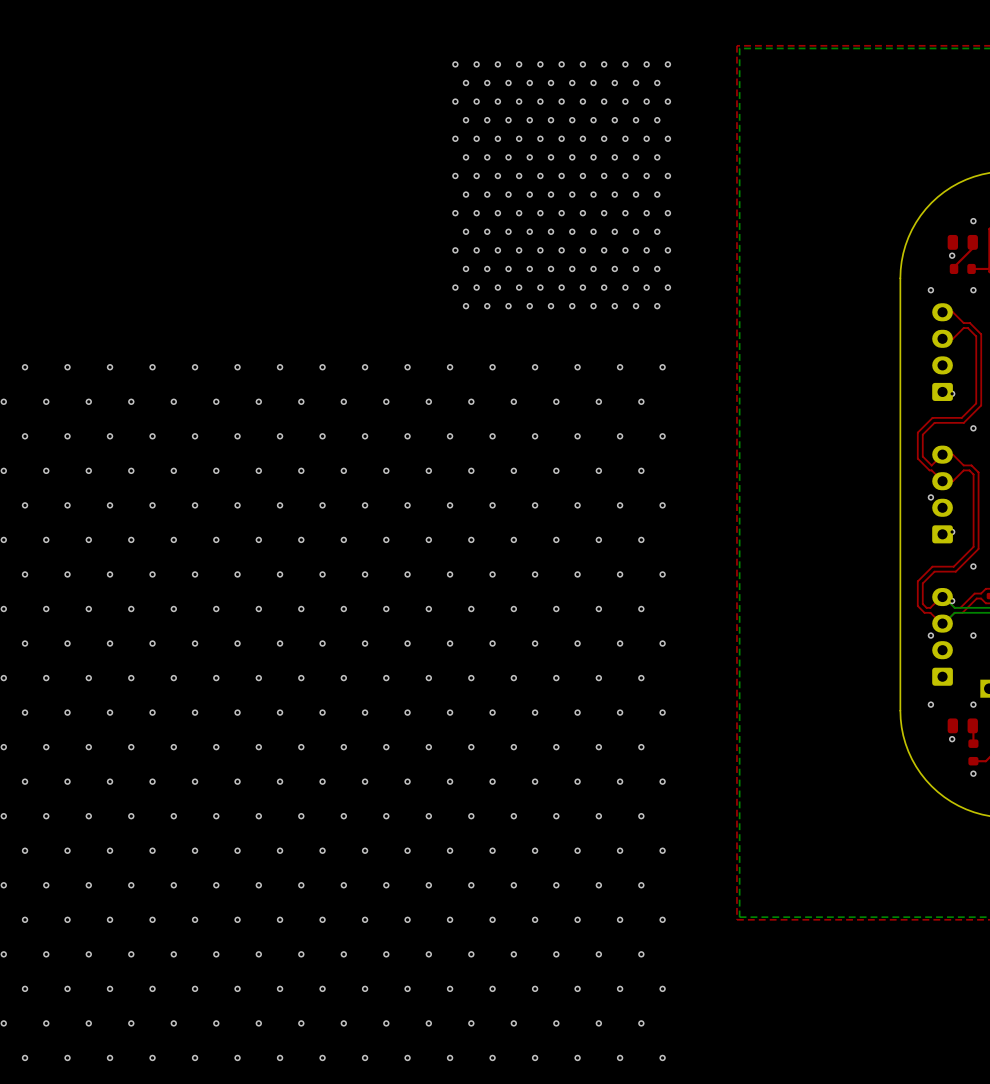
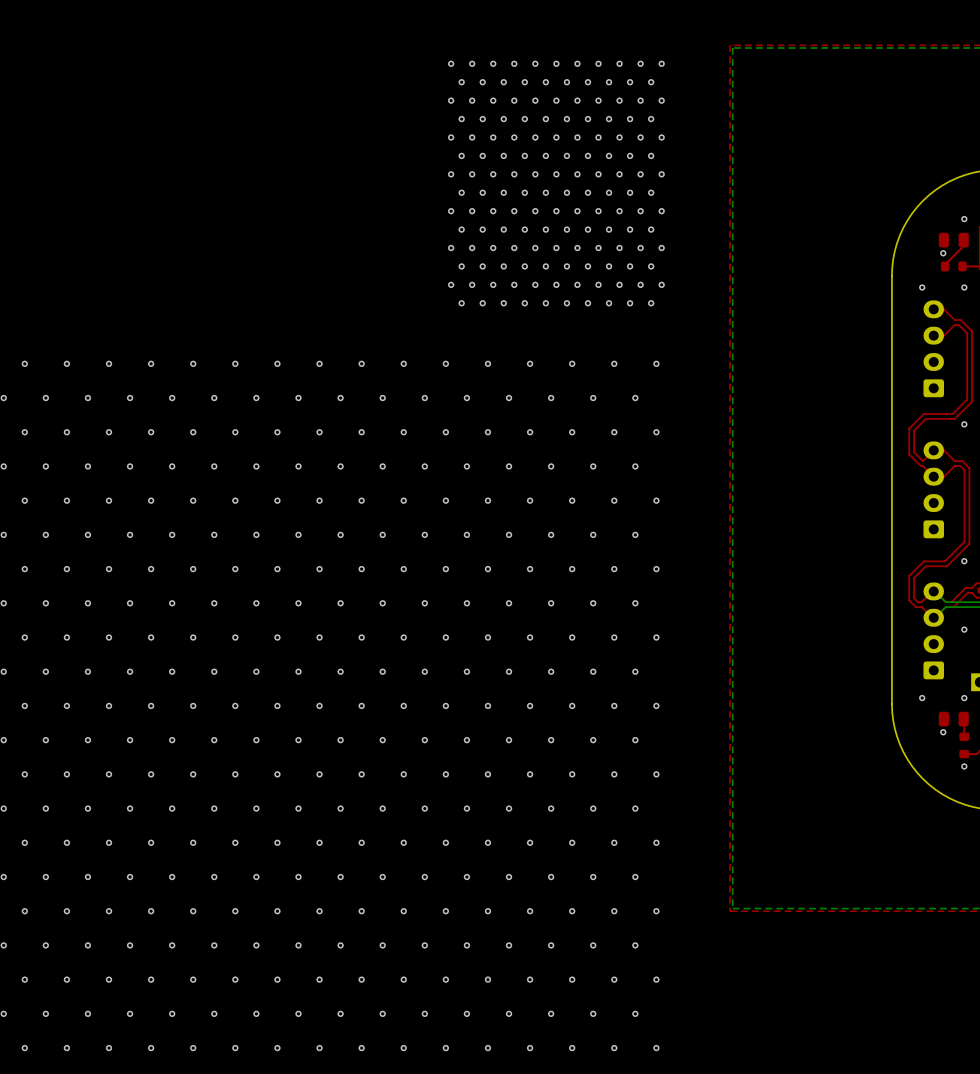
via: (952, 393) -> none
via: (930, 497) -> none
via: (952, 531) -> none
via: (952, 601) -> none
via: (930, 635) -> none

